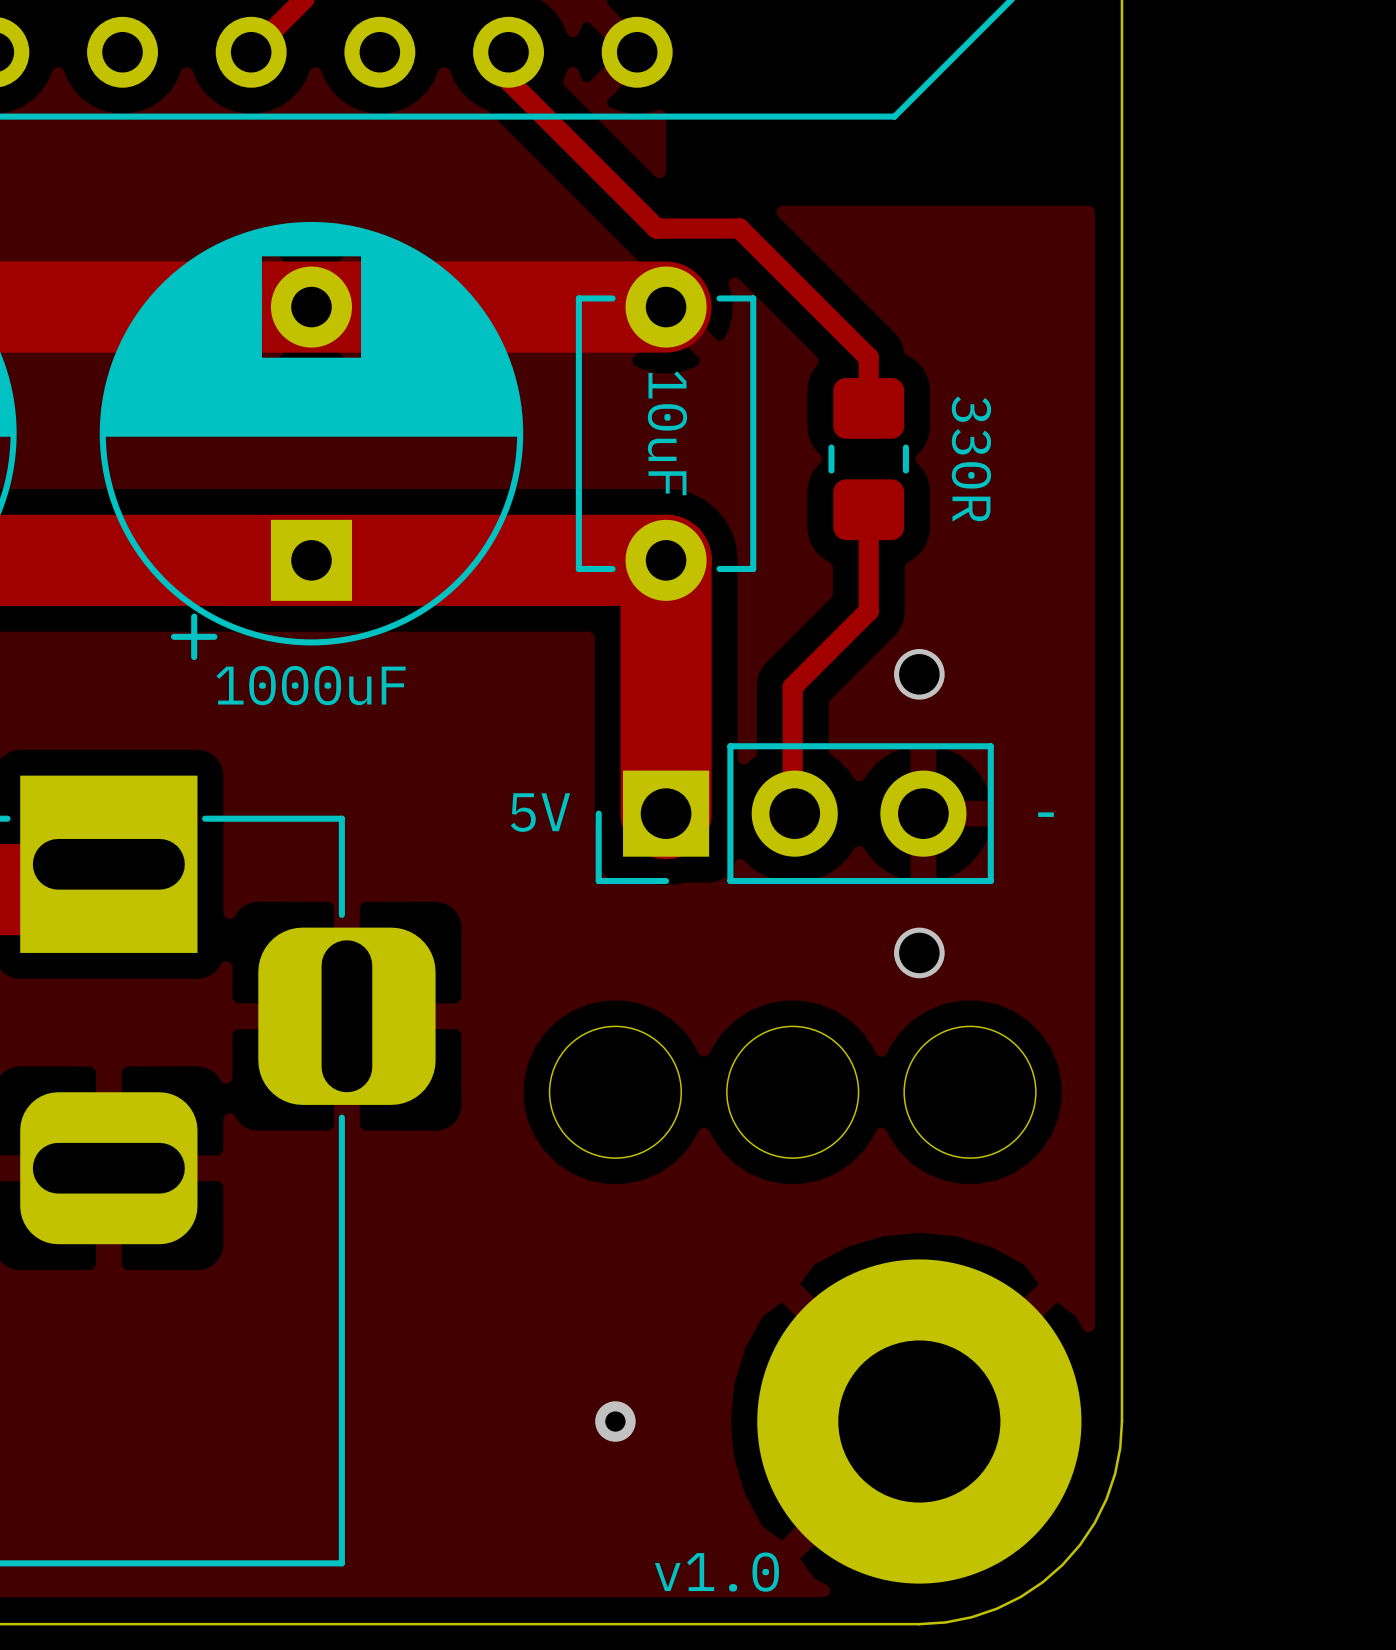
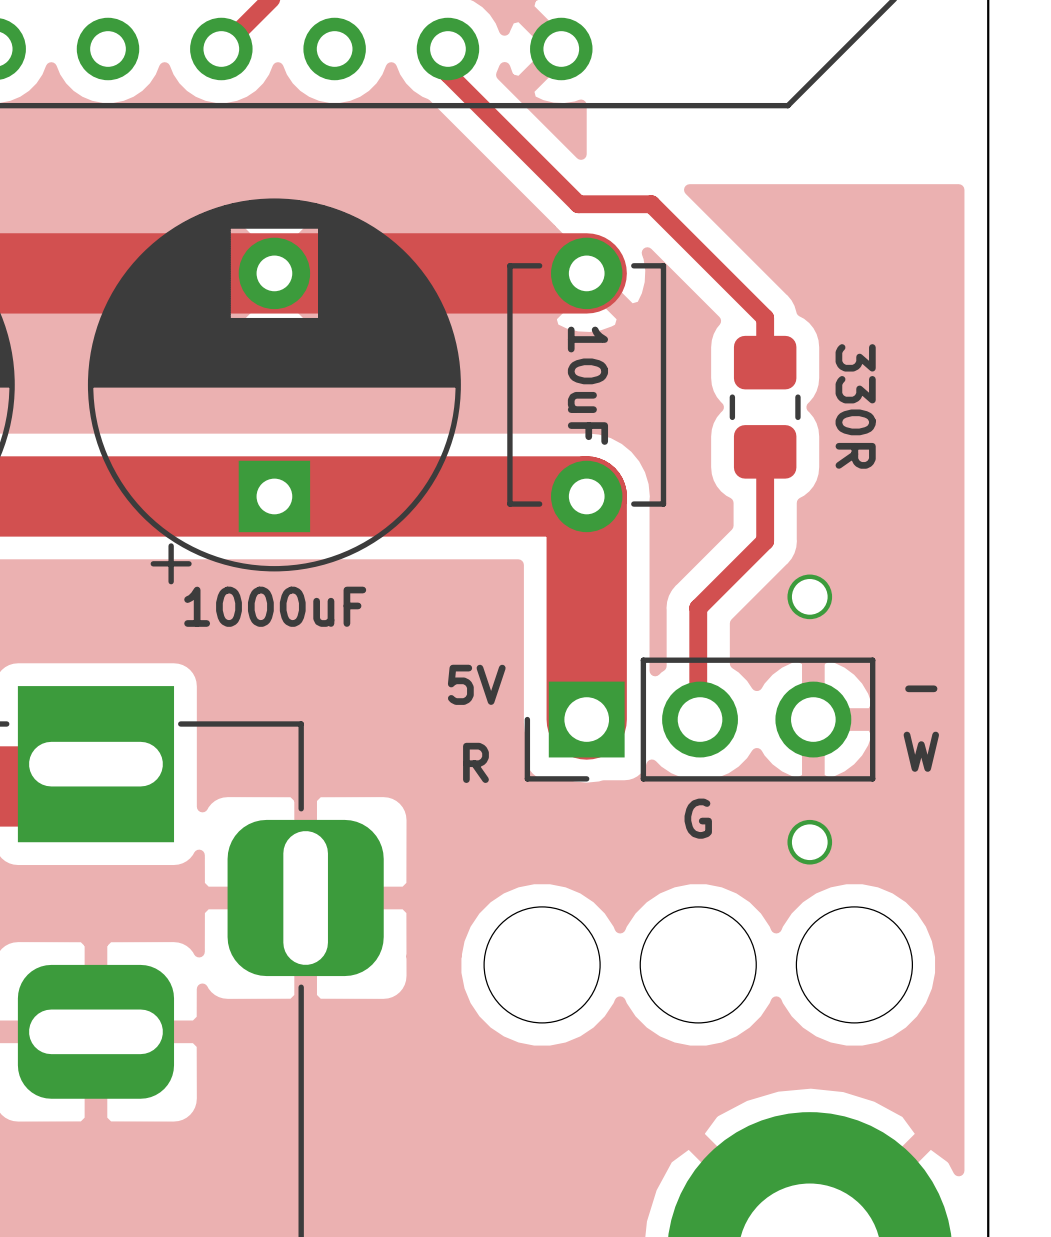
text position: 5V (540, 812) -> 5V (476, 684)
text position: - (1046, 814) -> - (921, 688)
text: none -> W (921, 751)
text: none -> R (475, 762)
text: none -> G (698, 818)

